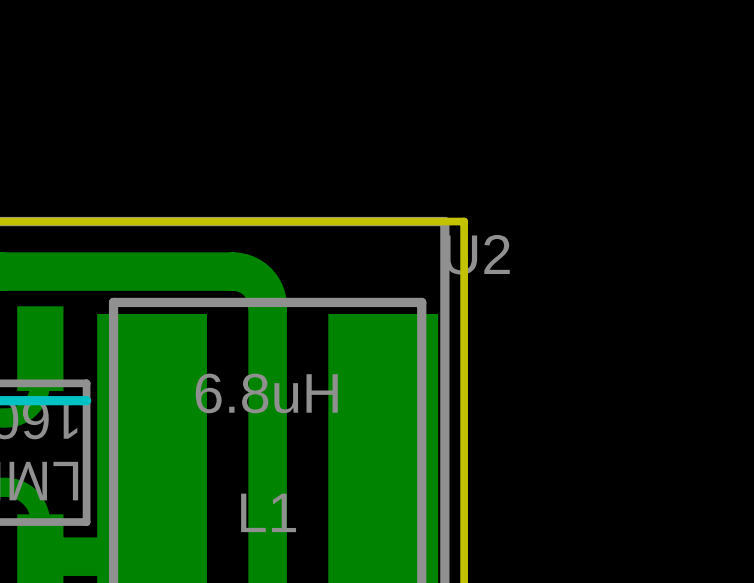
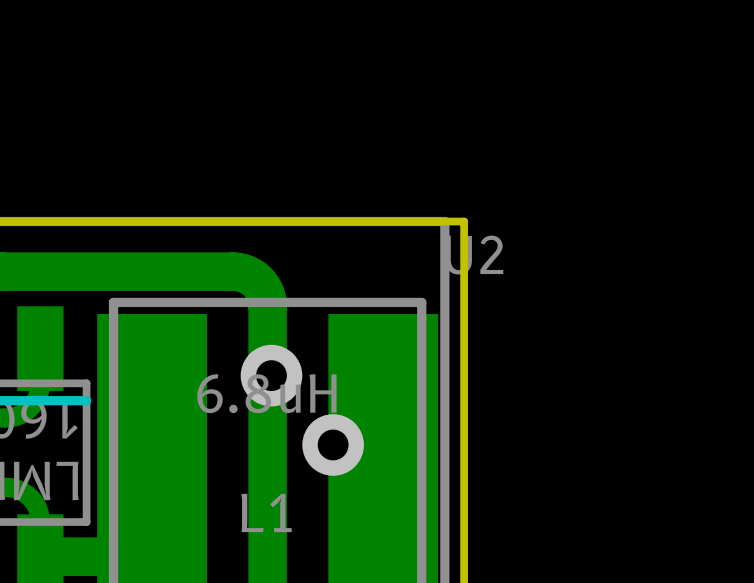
via: none -> (271, 375)
via: none -> (333, 444)

